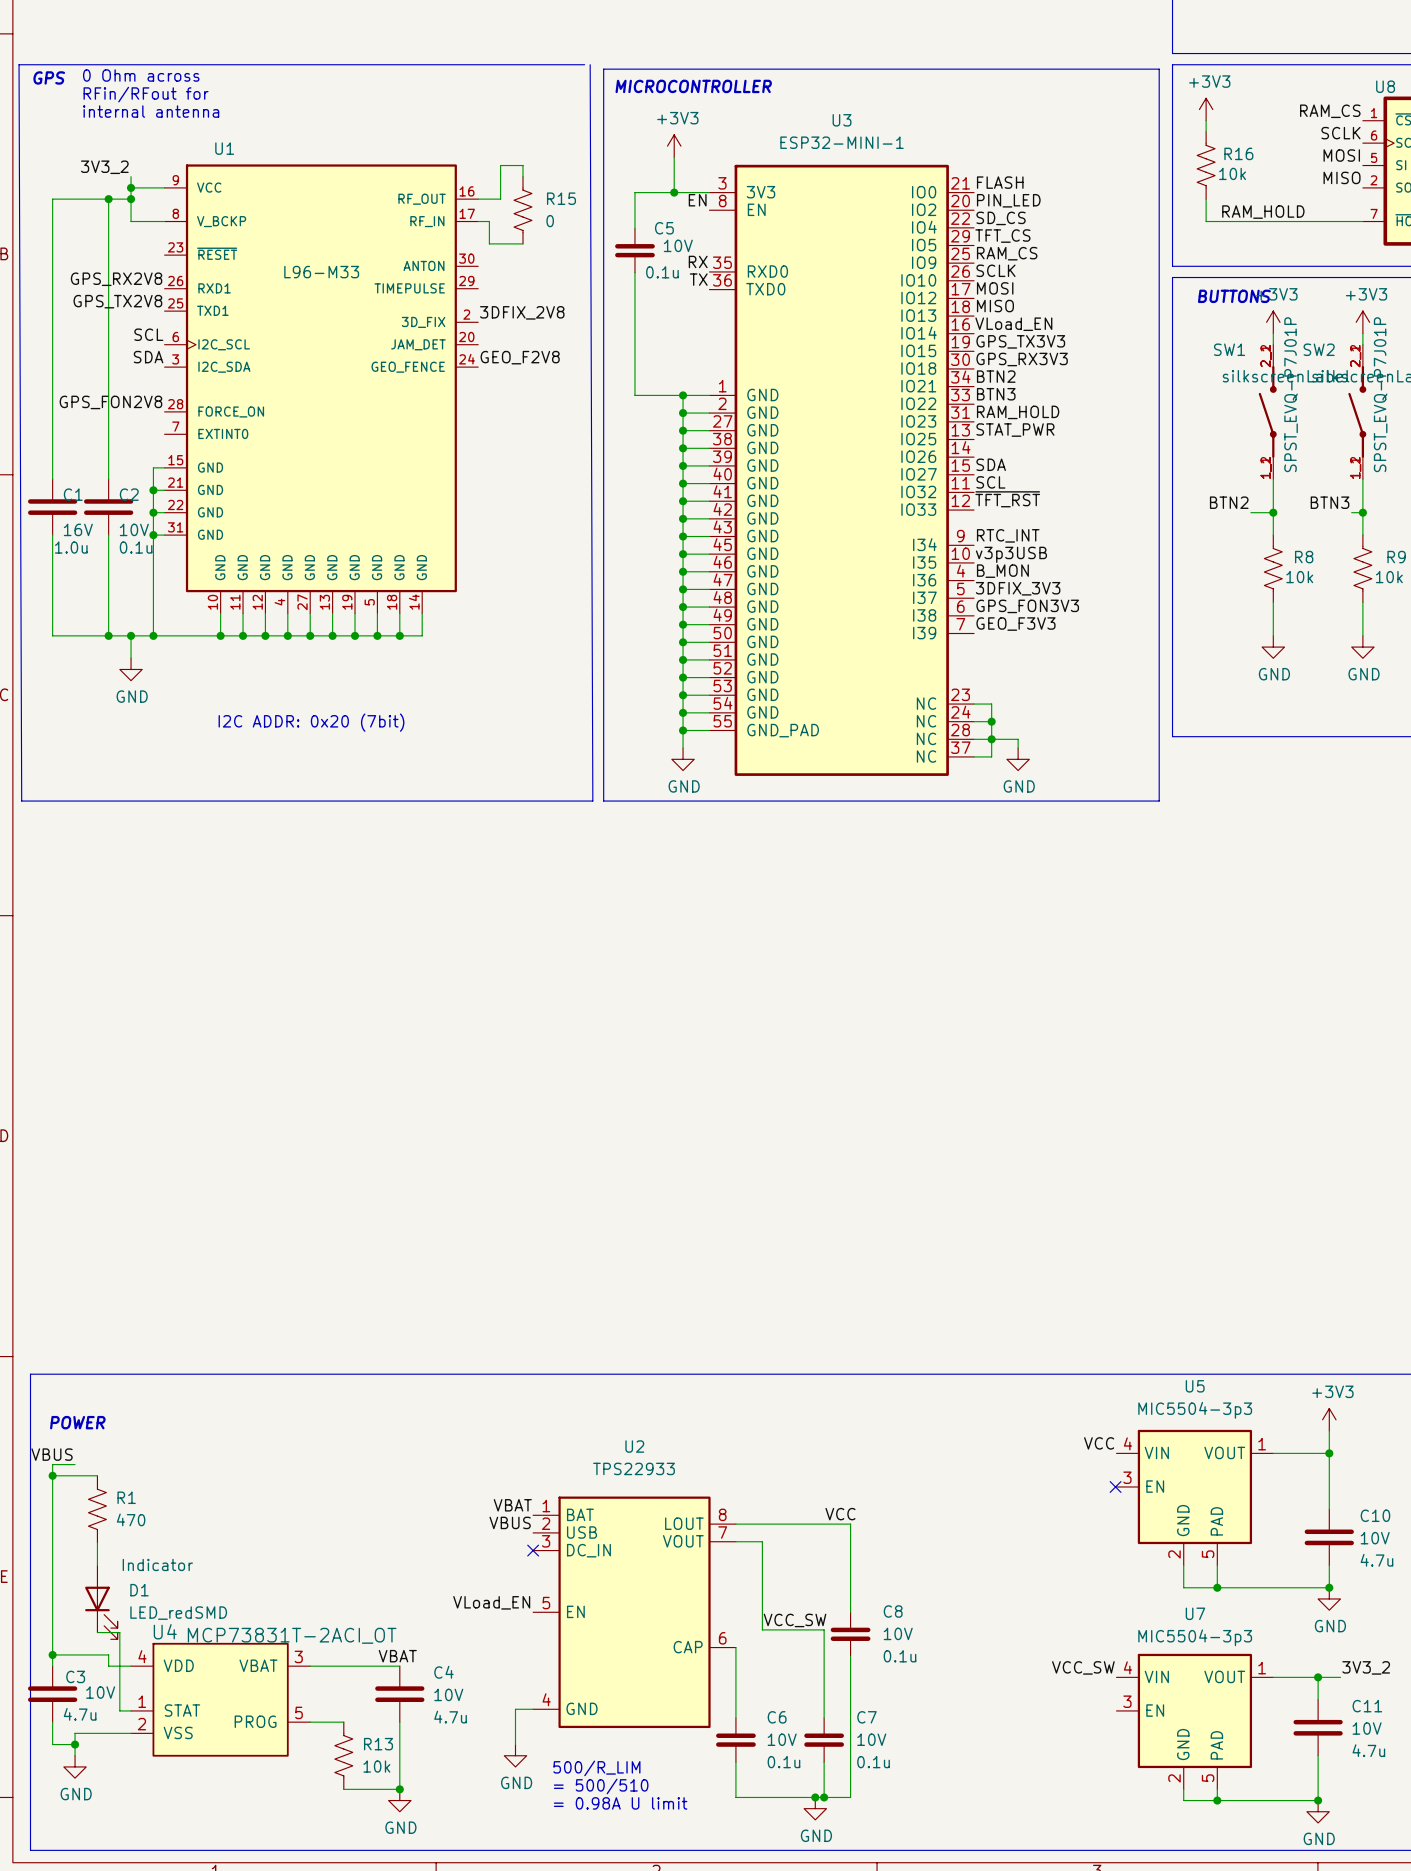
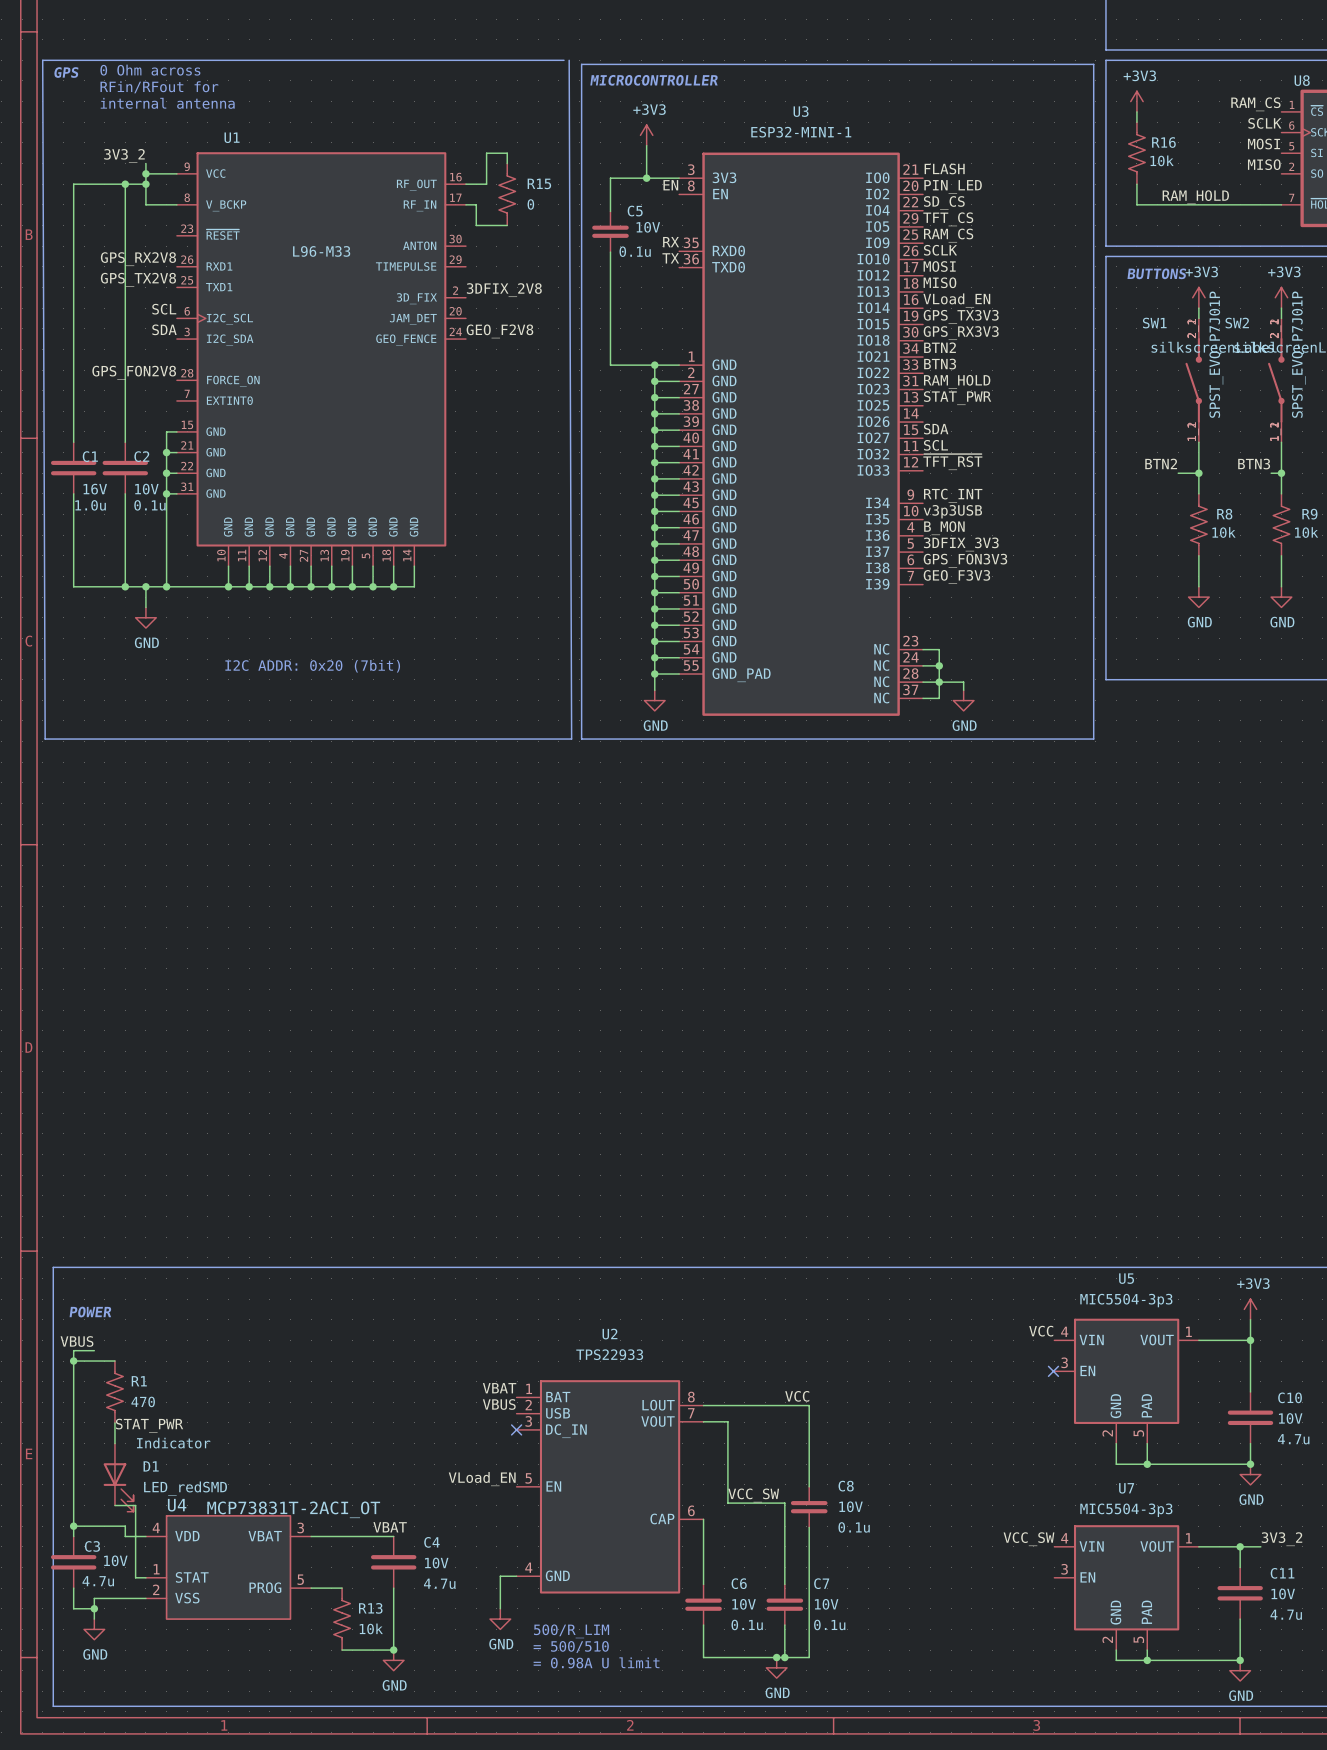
label: none -> STAT_PWR (149, 1425)

